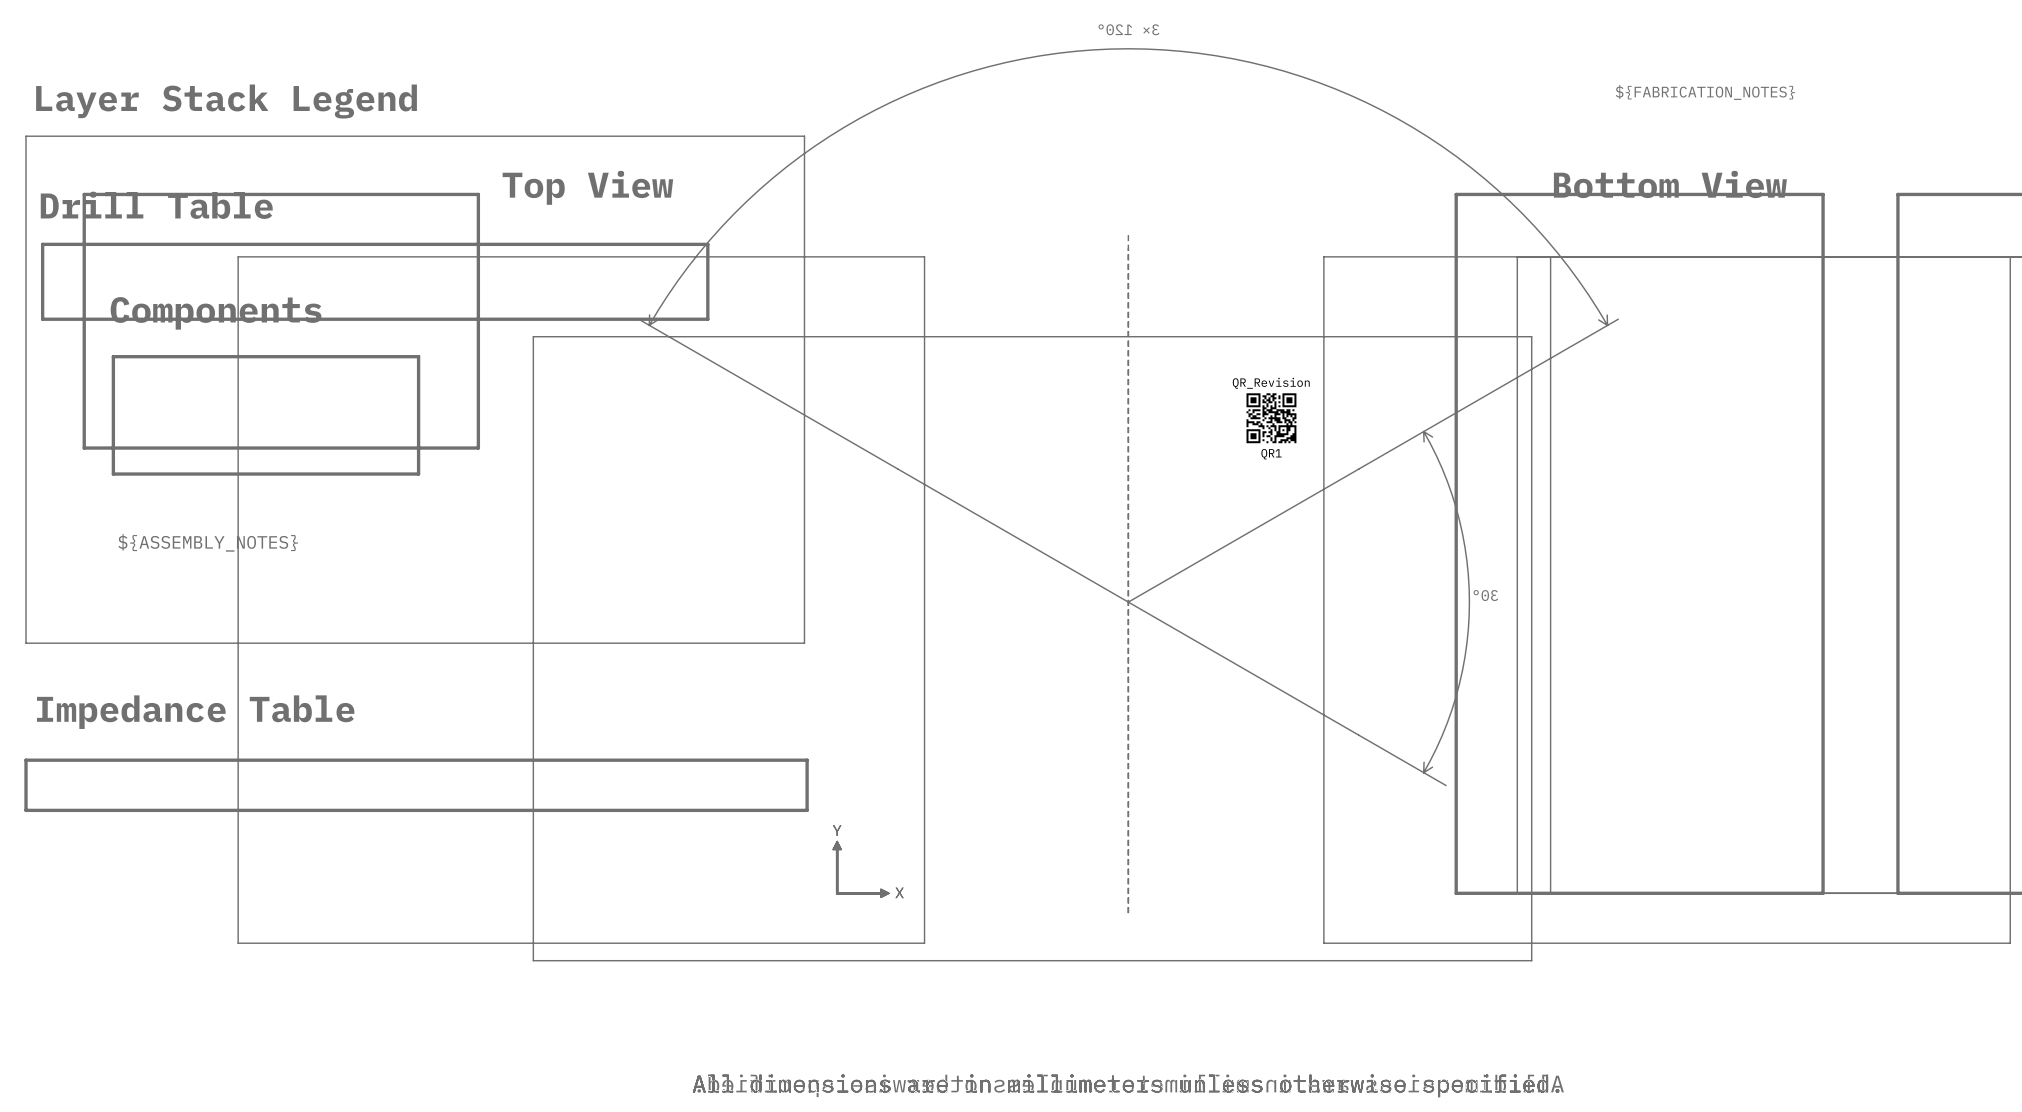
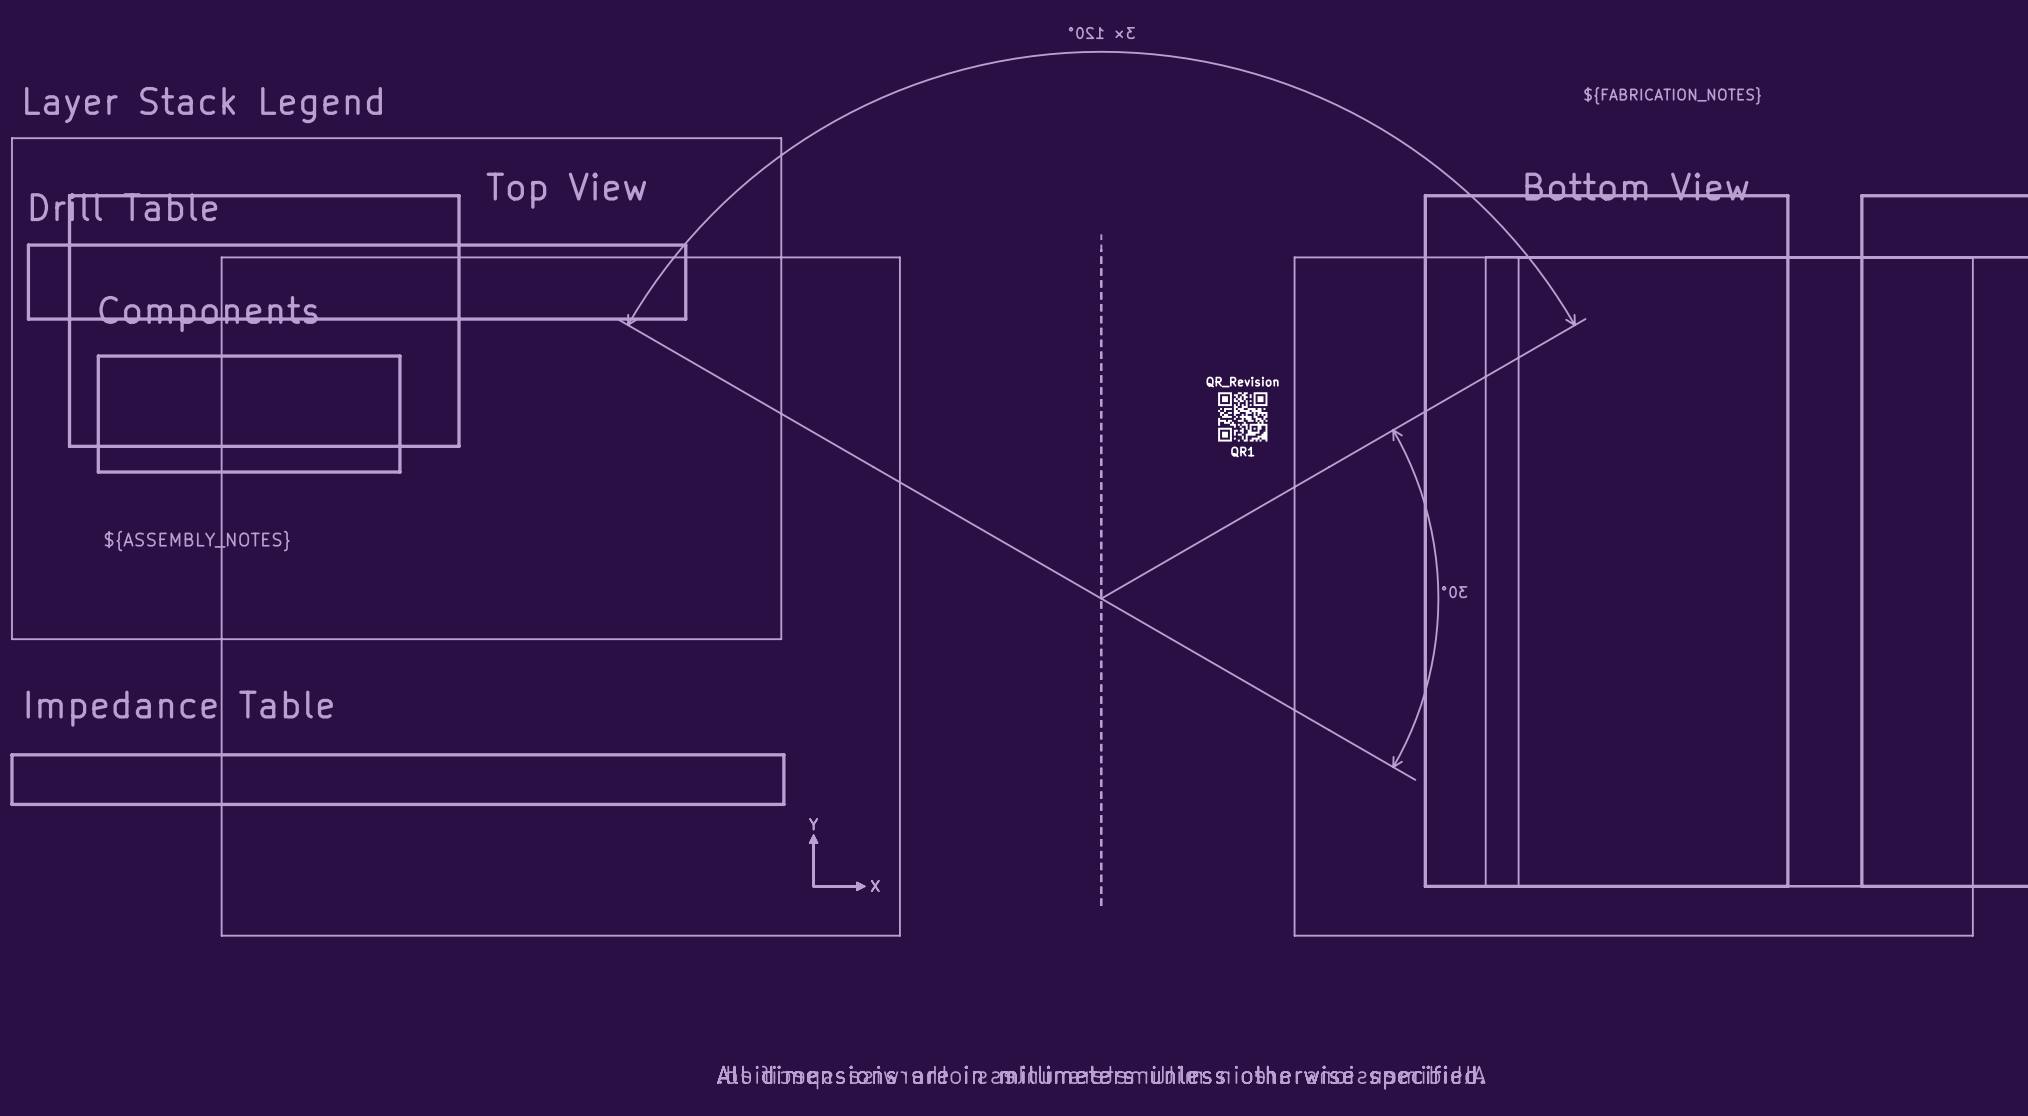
line: (533, 336) (1531, 336) (1531, 960) (533, 960) (533, 336) -> none

